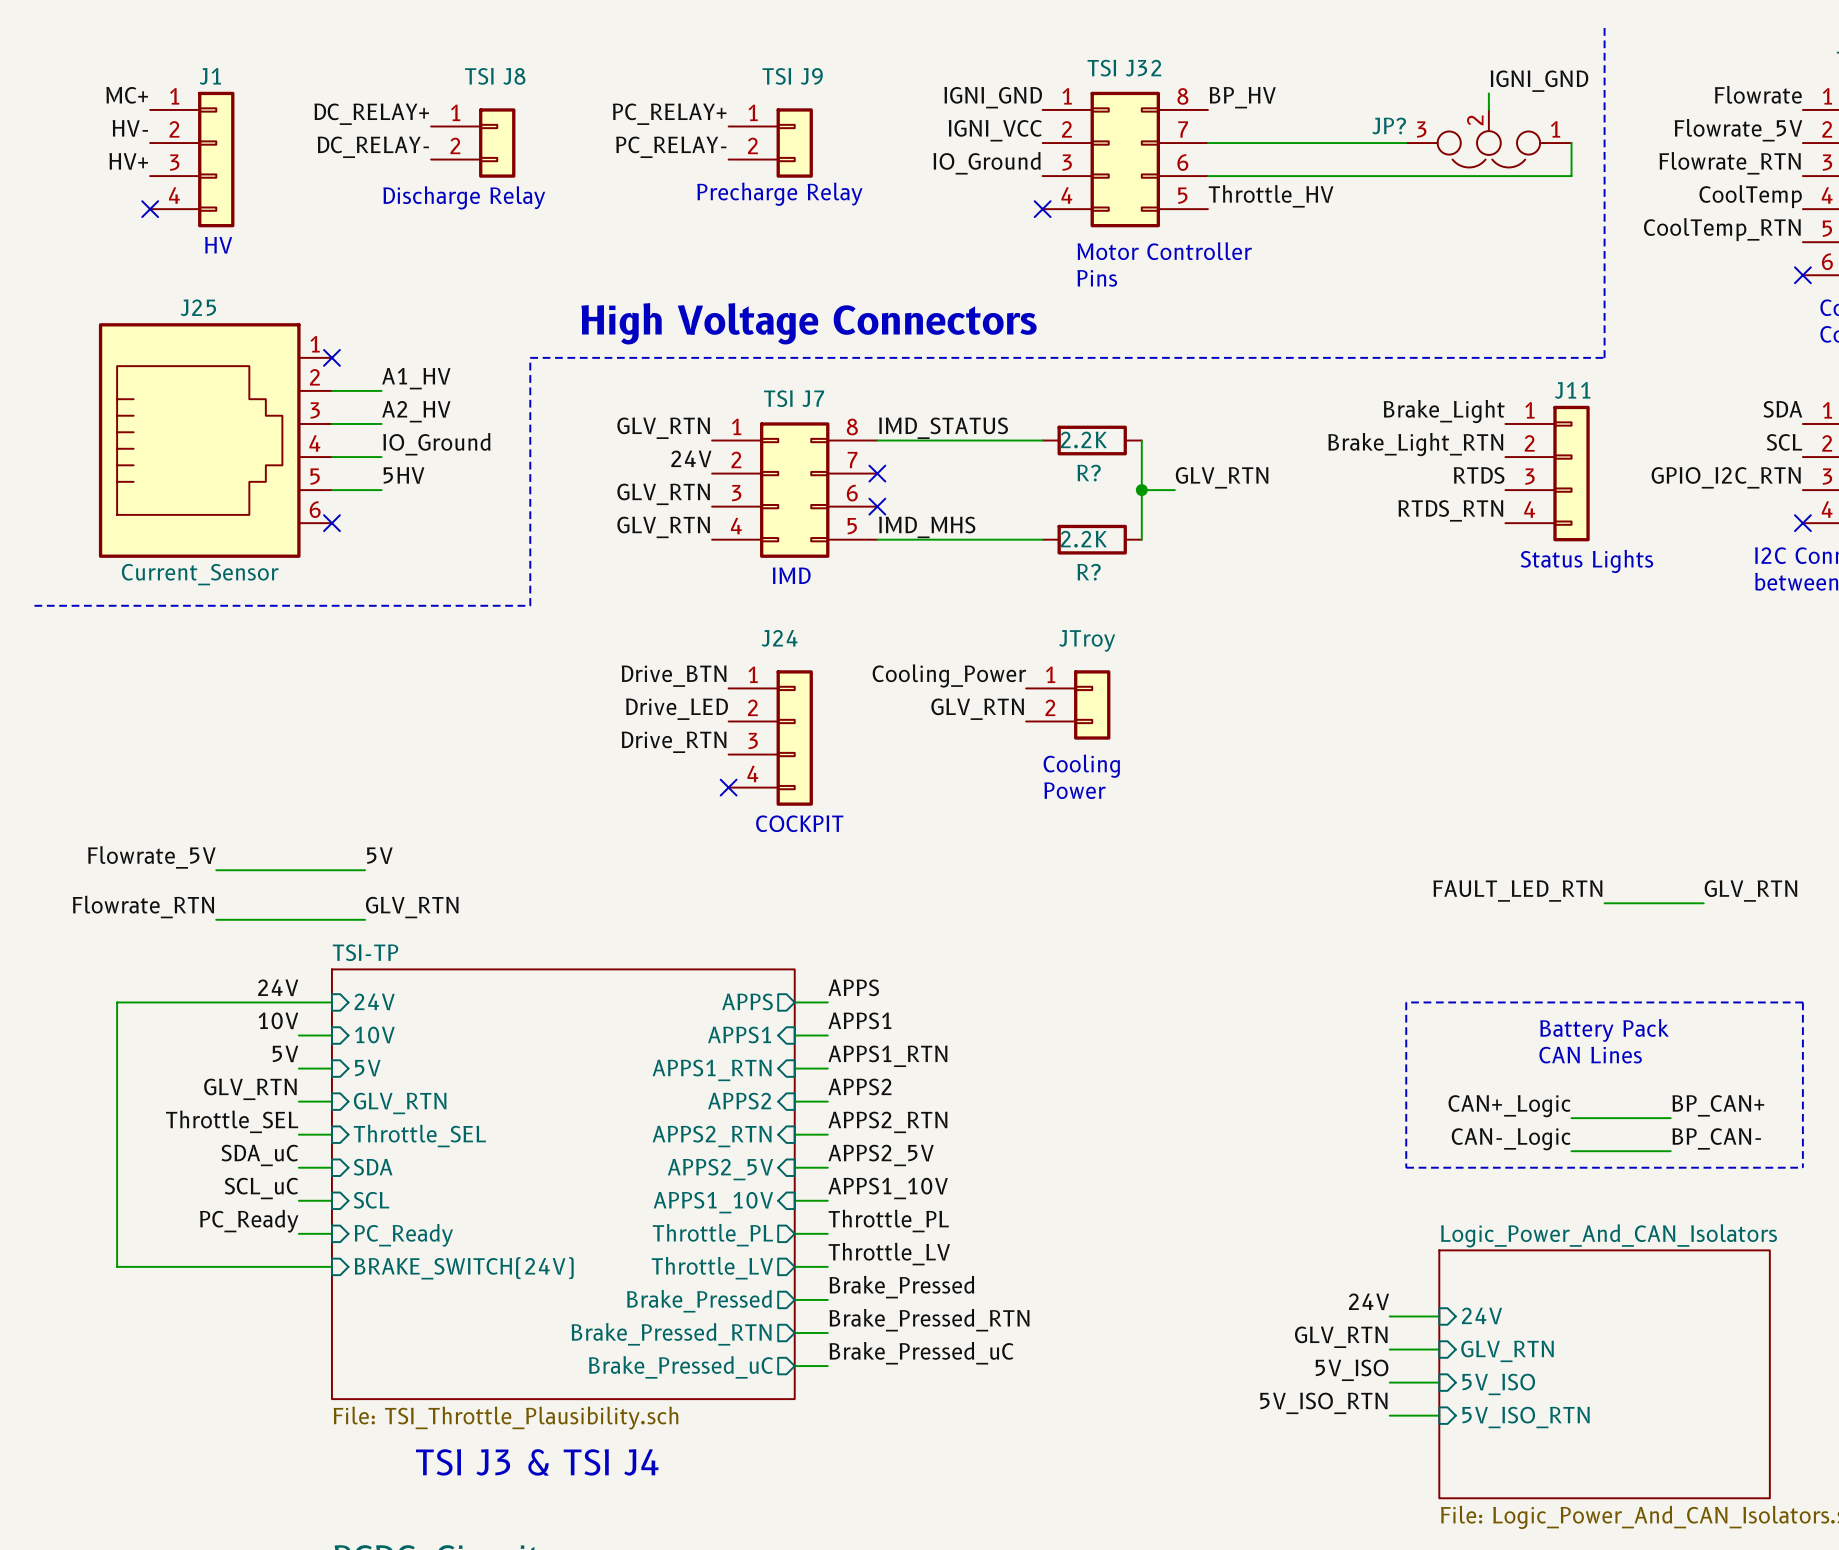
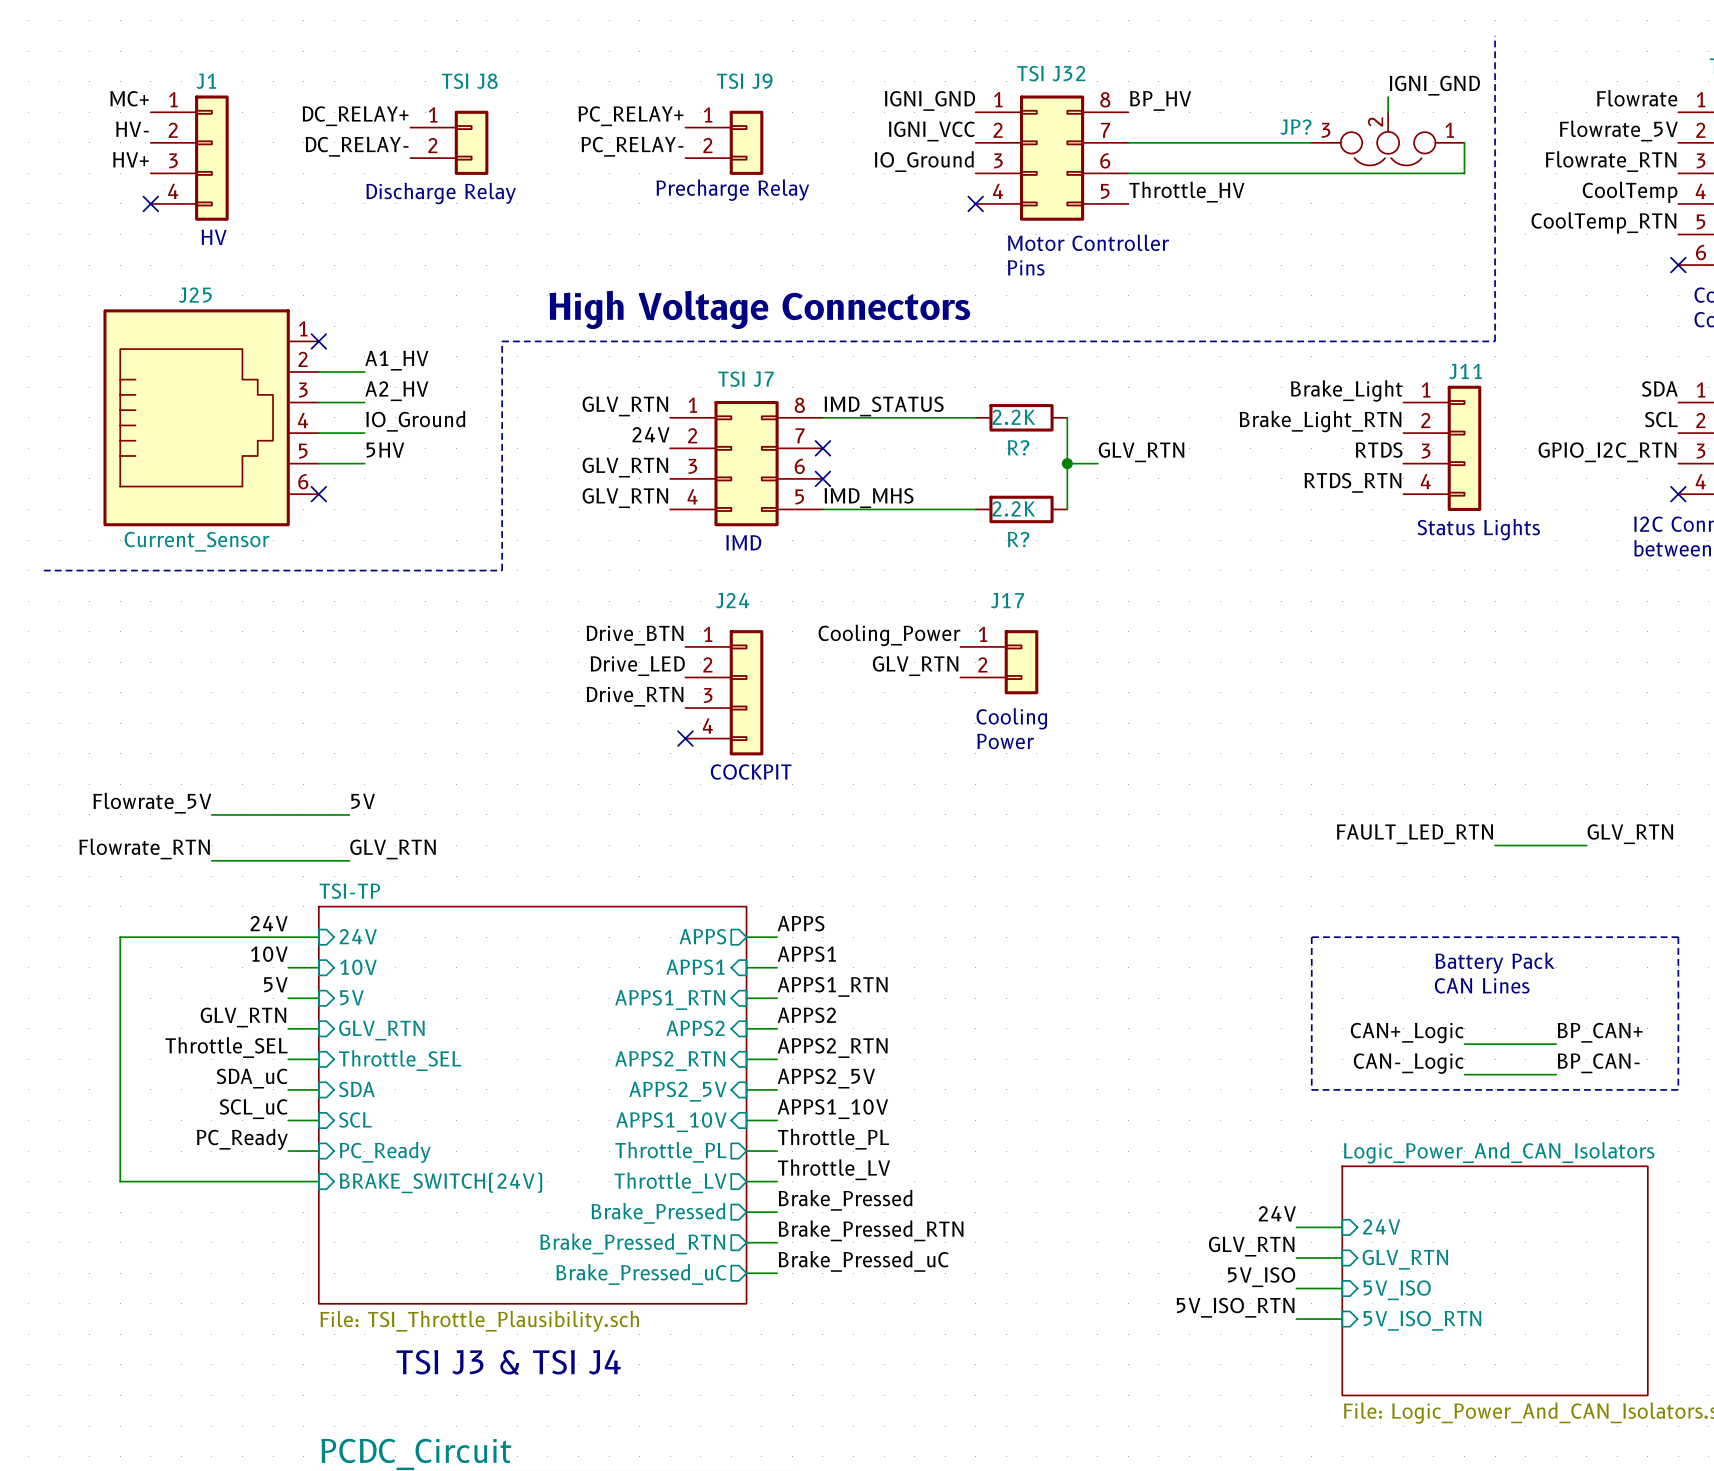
part value: JTroy (1087, 640) -> J17 (1007, 600)

